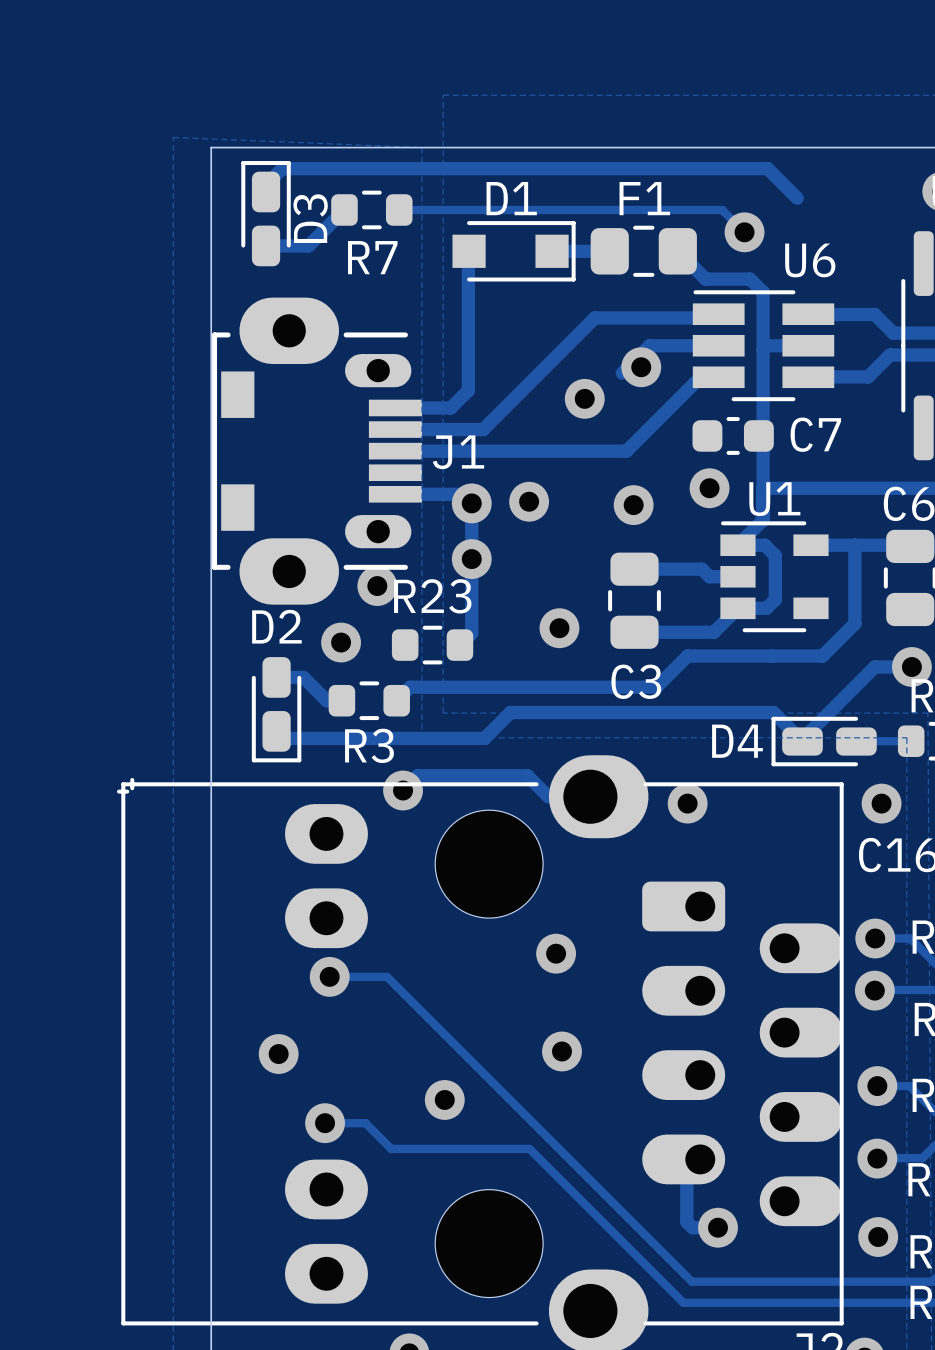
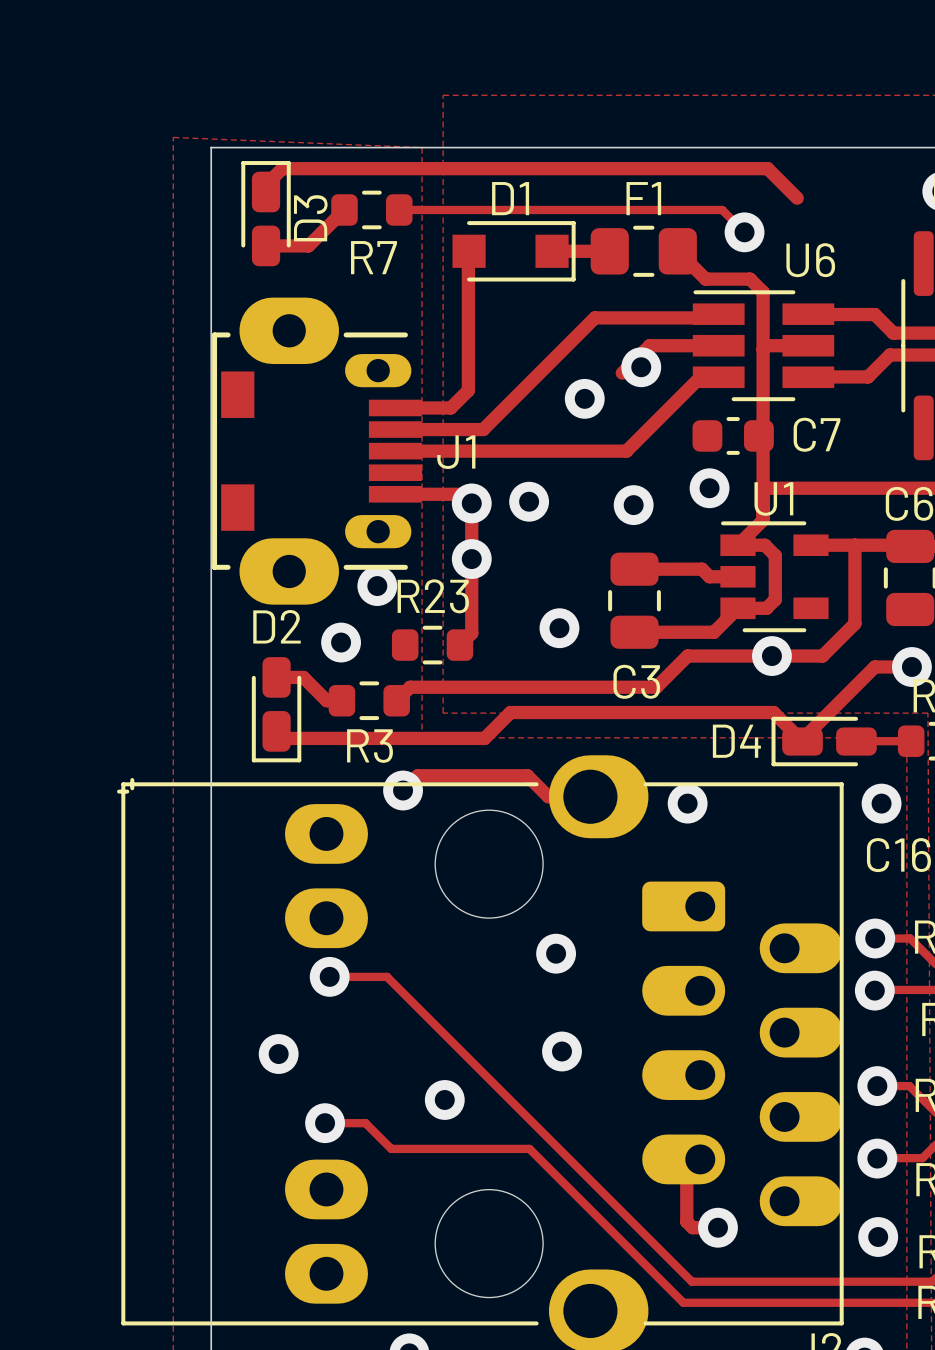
via: none -> (771, 656)

